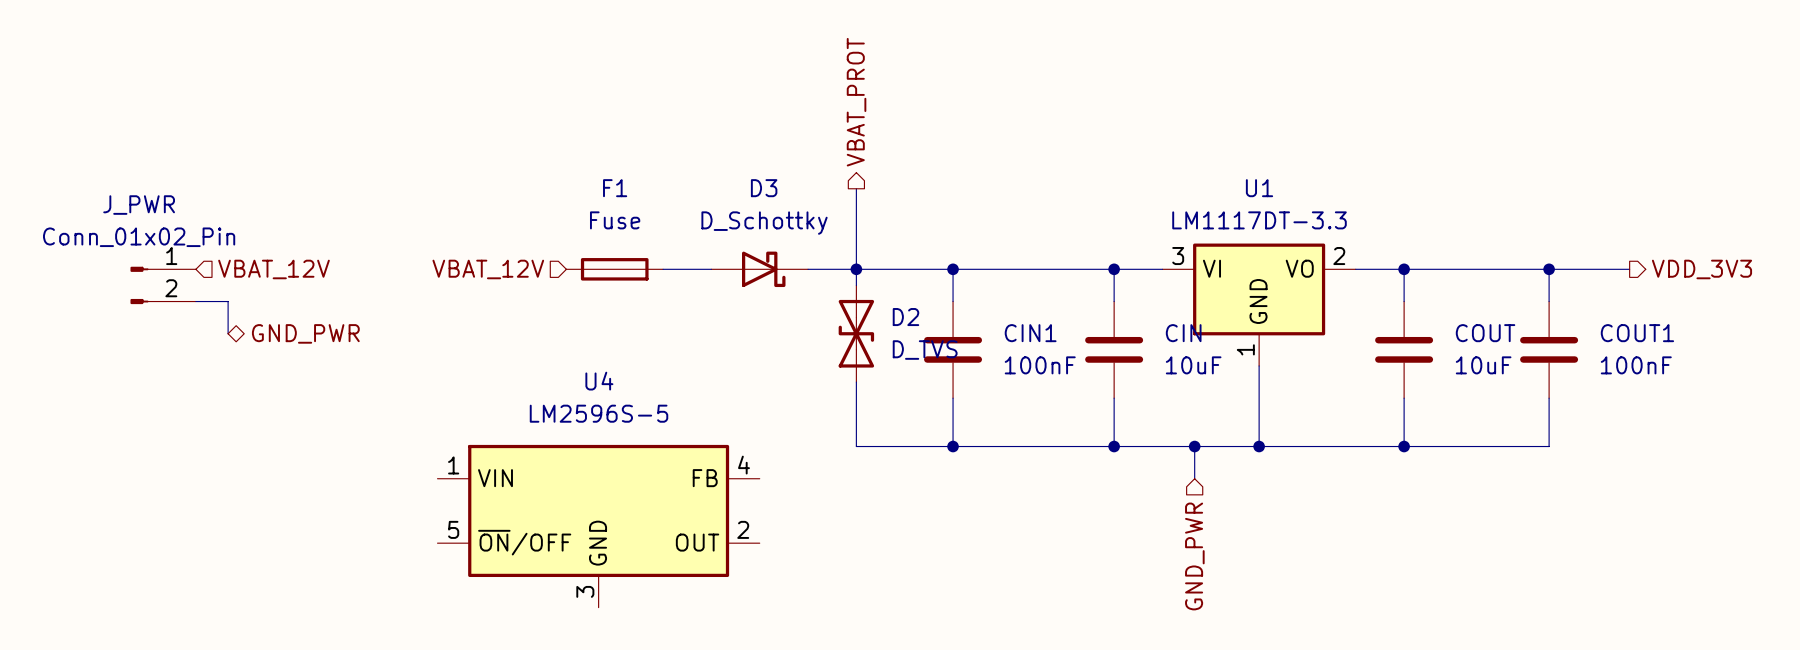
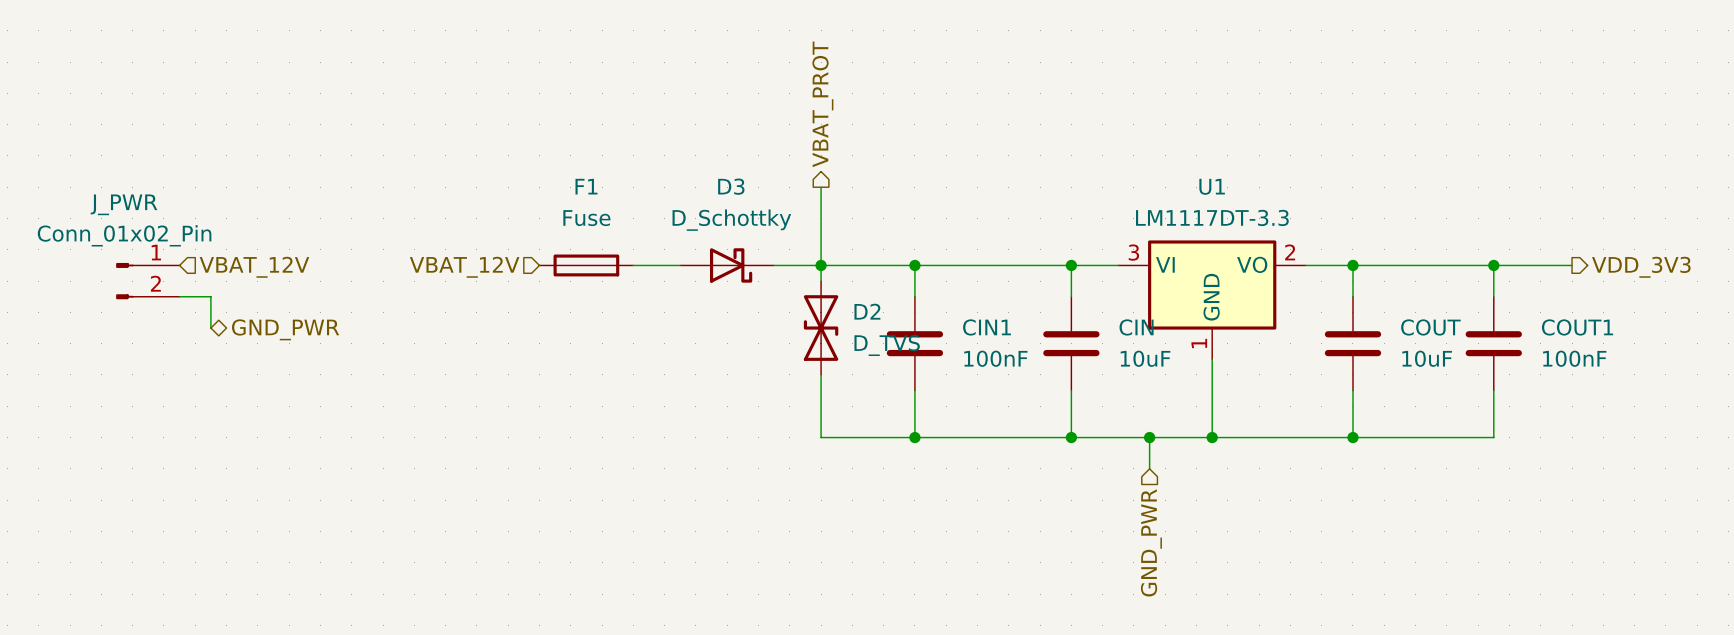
U4: LM2596S-5 (598, 526) -> none

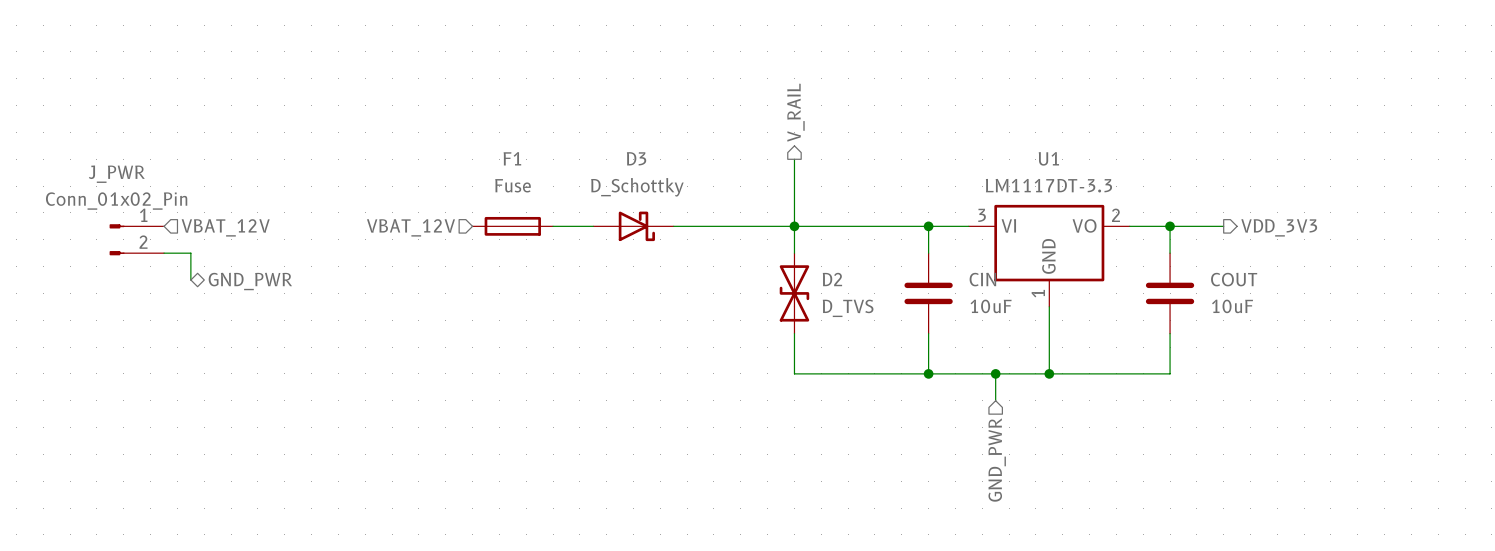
hierarchical label: VBAT_PROT (822, 104) -> none
hierarchical label: none -> V_RAIL (795, 112)
wire: (821, 187) (821, 281) -> none
wire: none -> (794, 159) (794, 226)
junction: (821, 265) -> none
wire: (1415, 265) (1572, 265) -> none
wire: (1493, 265) (1493, 296) -> none
junction: (1493, 265) -> none
hierarchical label position: VDD_3V3 (1641, 267) -> VDD_3V3 (1279, 227)
D2 position: (821, 328) -> (794, 293)
CIN1: 100nF (914, 343) -> none
COUT1: 100nF (1493, 343) -> none
wire: (821, 374) (821, 437) (914, 437) -> none
wire: (1493, 390) (1493, 437) (1352, 437) -> none
junction: (914, 437) -> none
junction: (1352, 437) -> none

